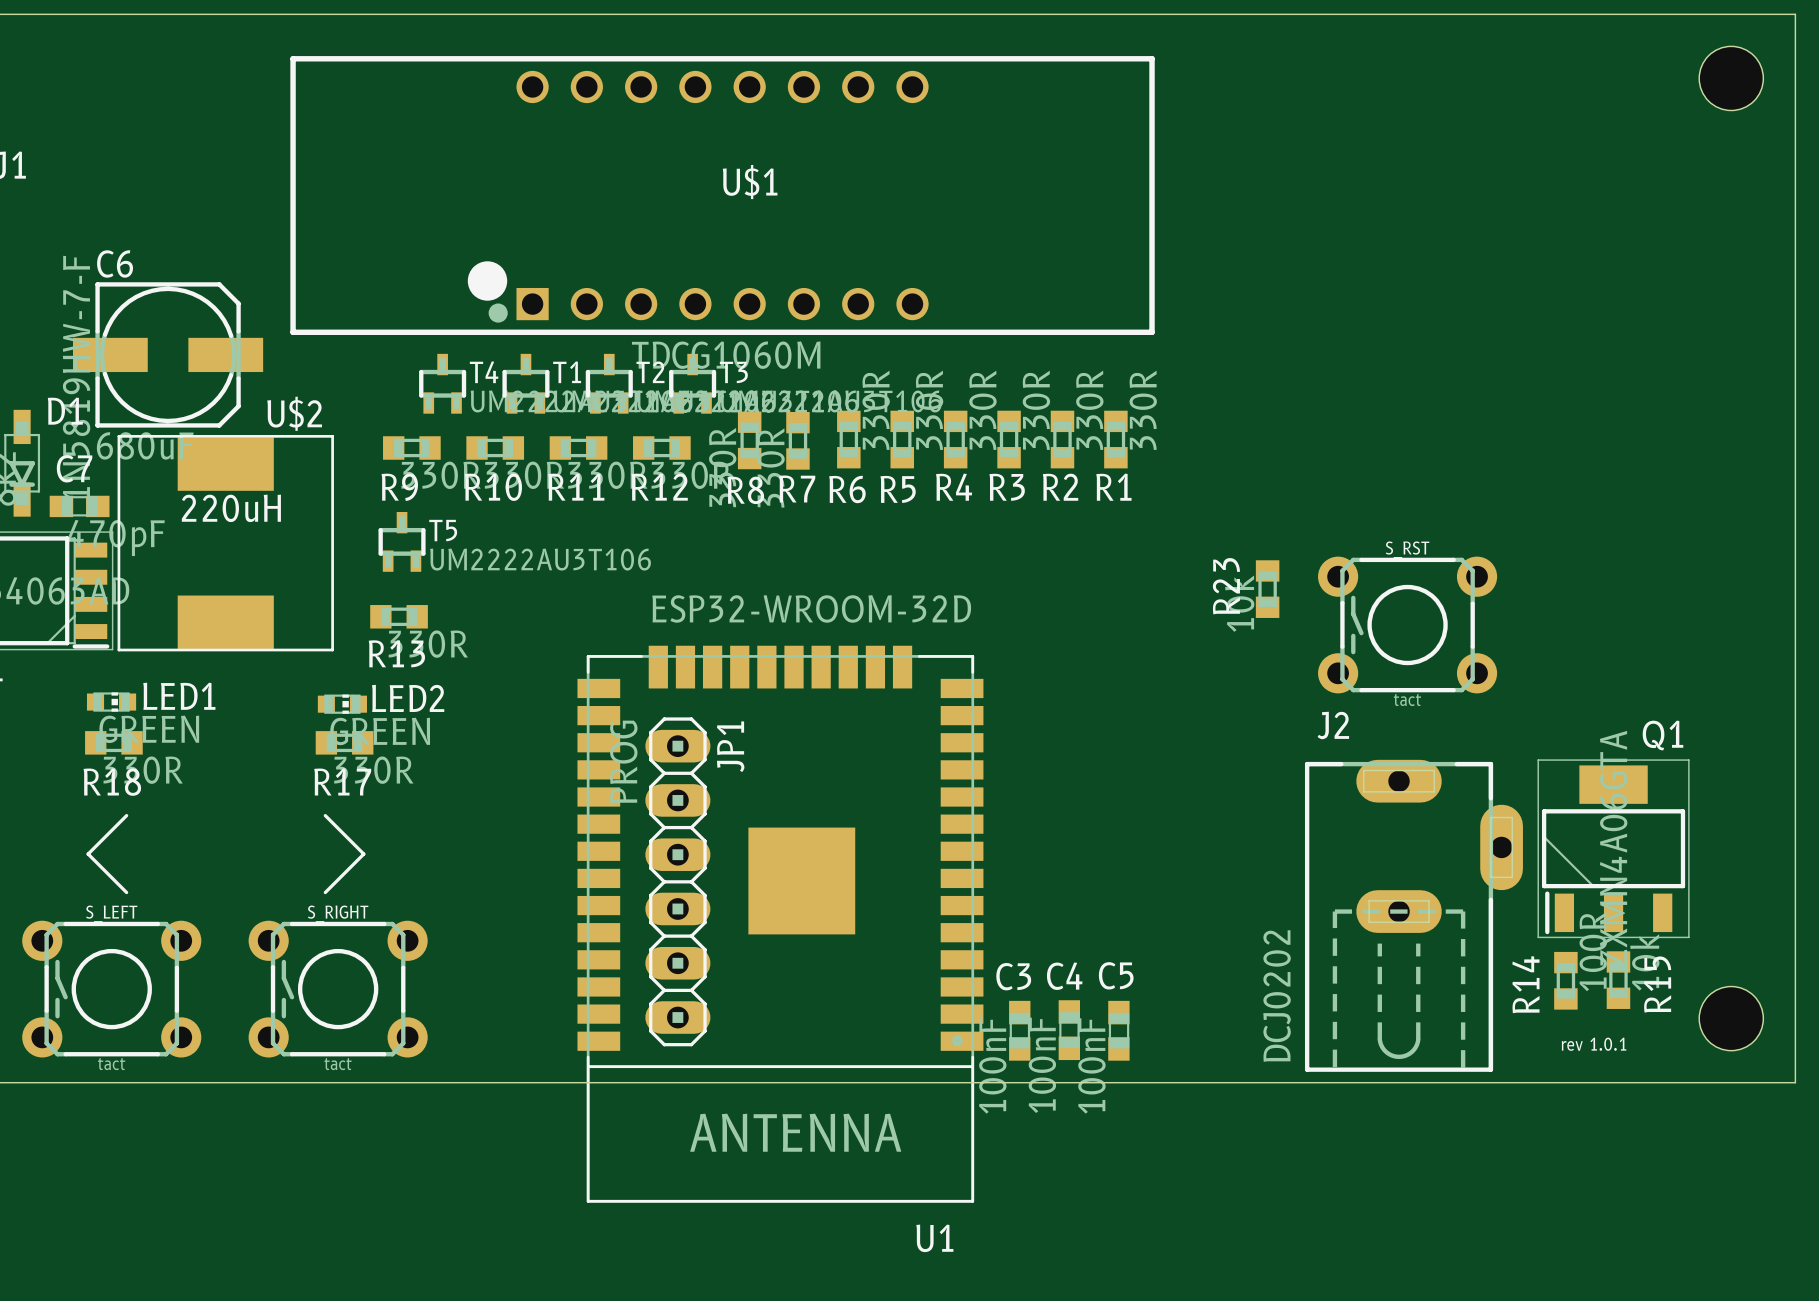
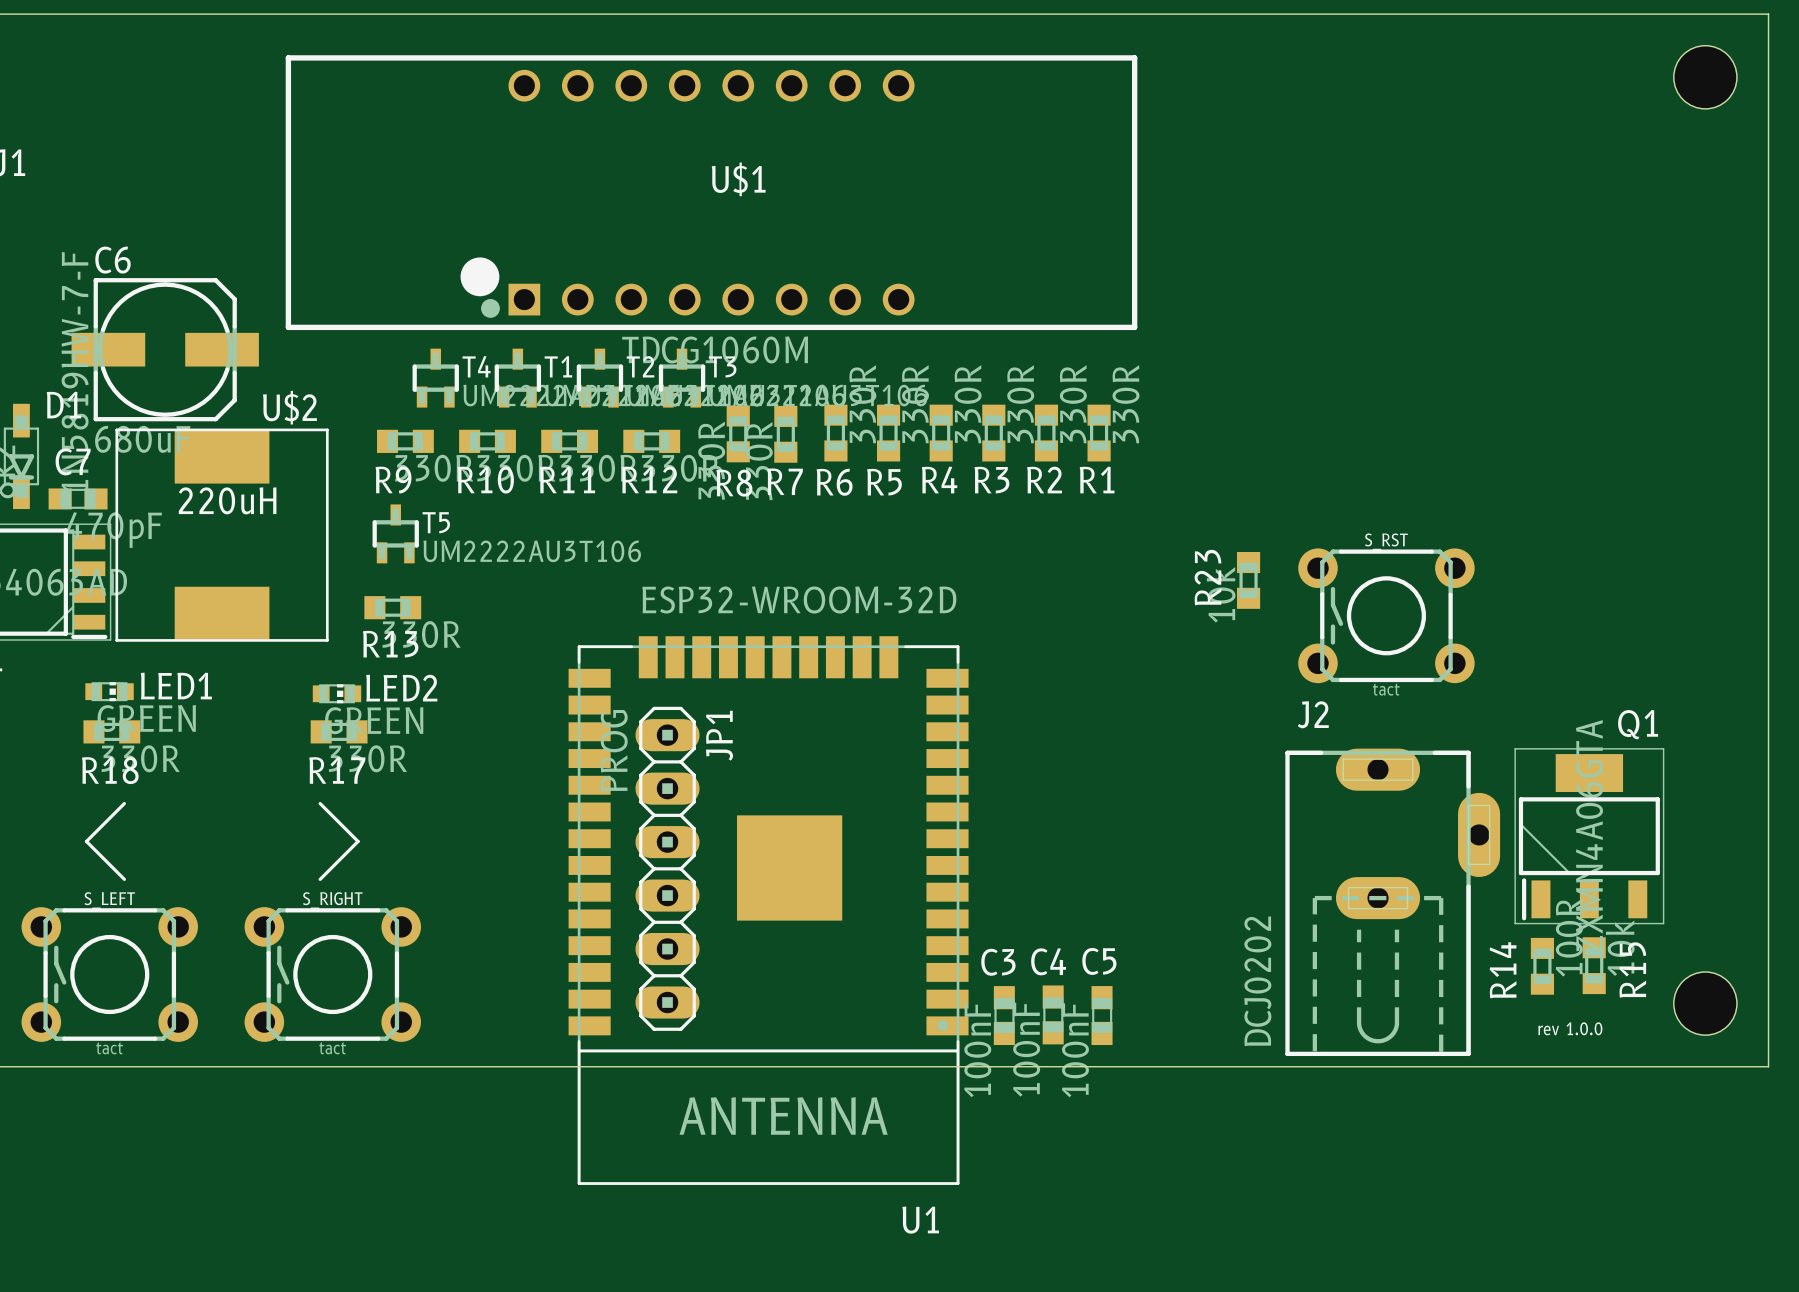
text: rev 1.0.1 (1594, 1044) -> rev 1.0.0 (1570, 1028)

